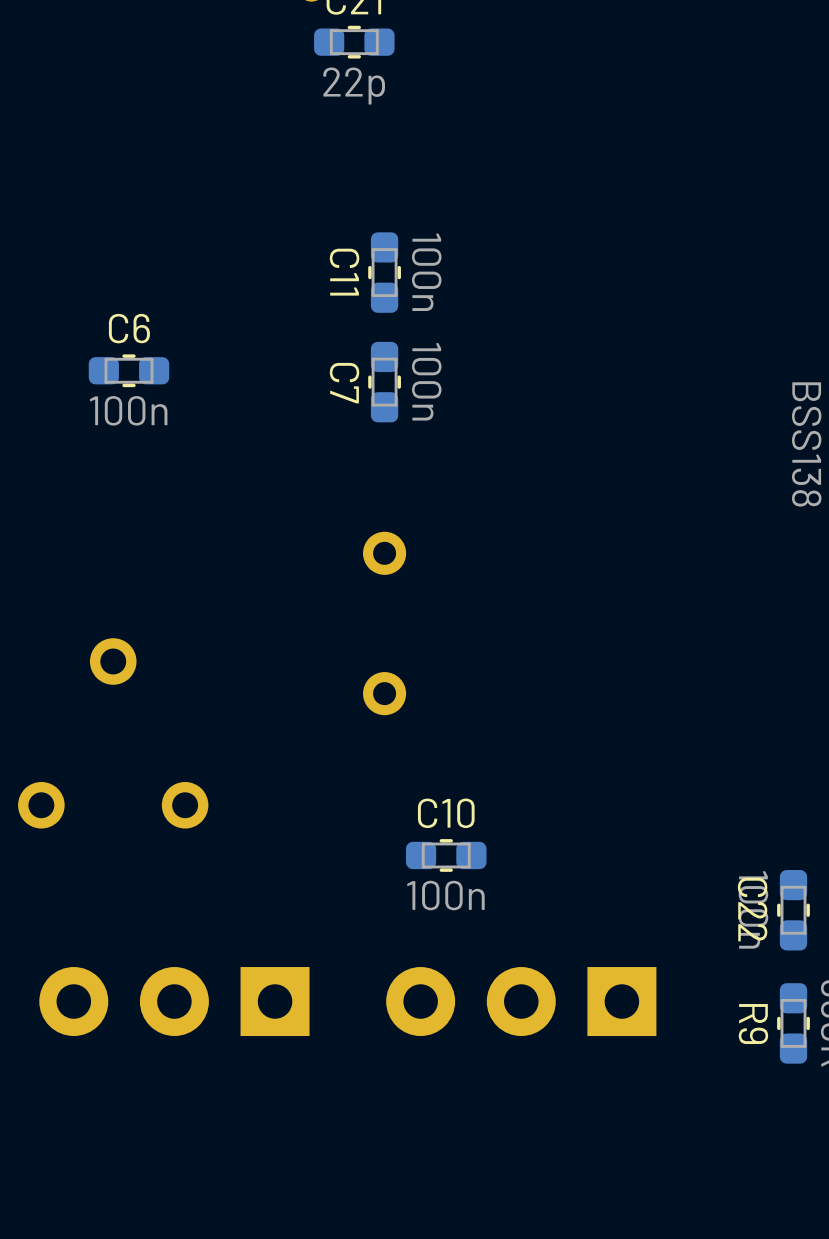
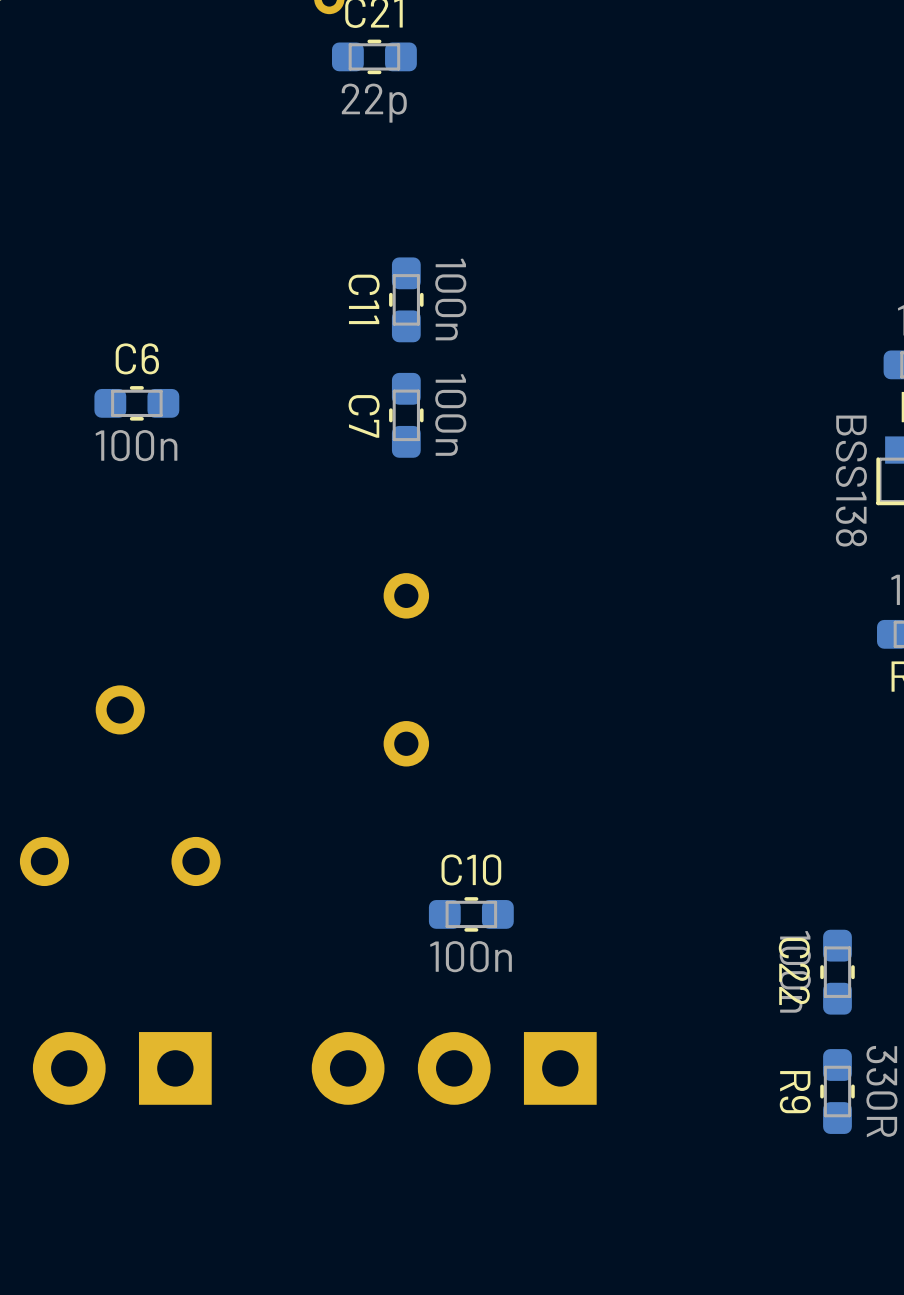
part: none -> (122, 1068)
part: (174, 1001) -> none
part position: (521, 1001) -> (454, 1068)

